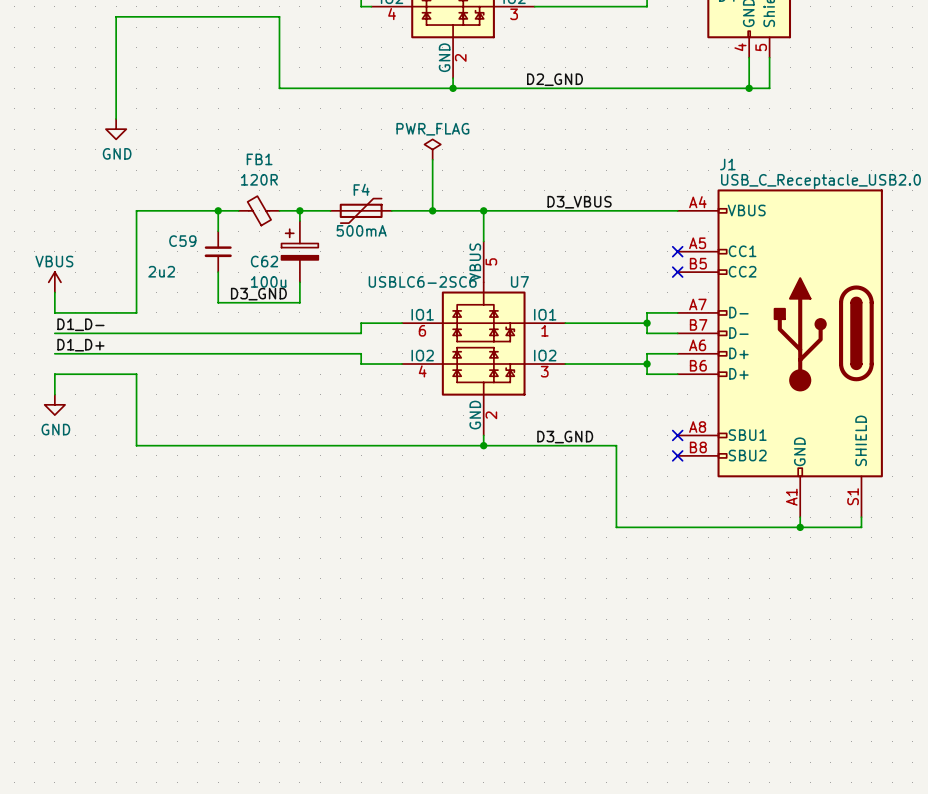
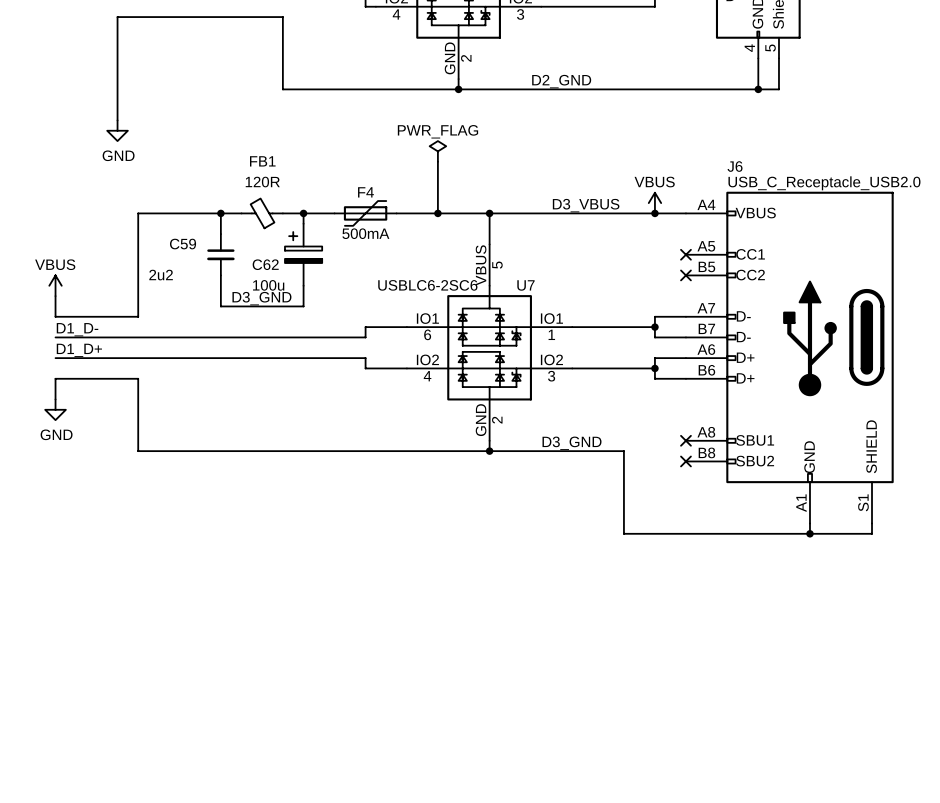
J1 name: J1 (727, 164) -> J6 (735, 166)
power symbol: none -> VBUS (654, 203)
junction: none -> (654, 213)

